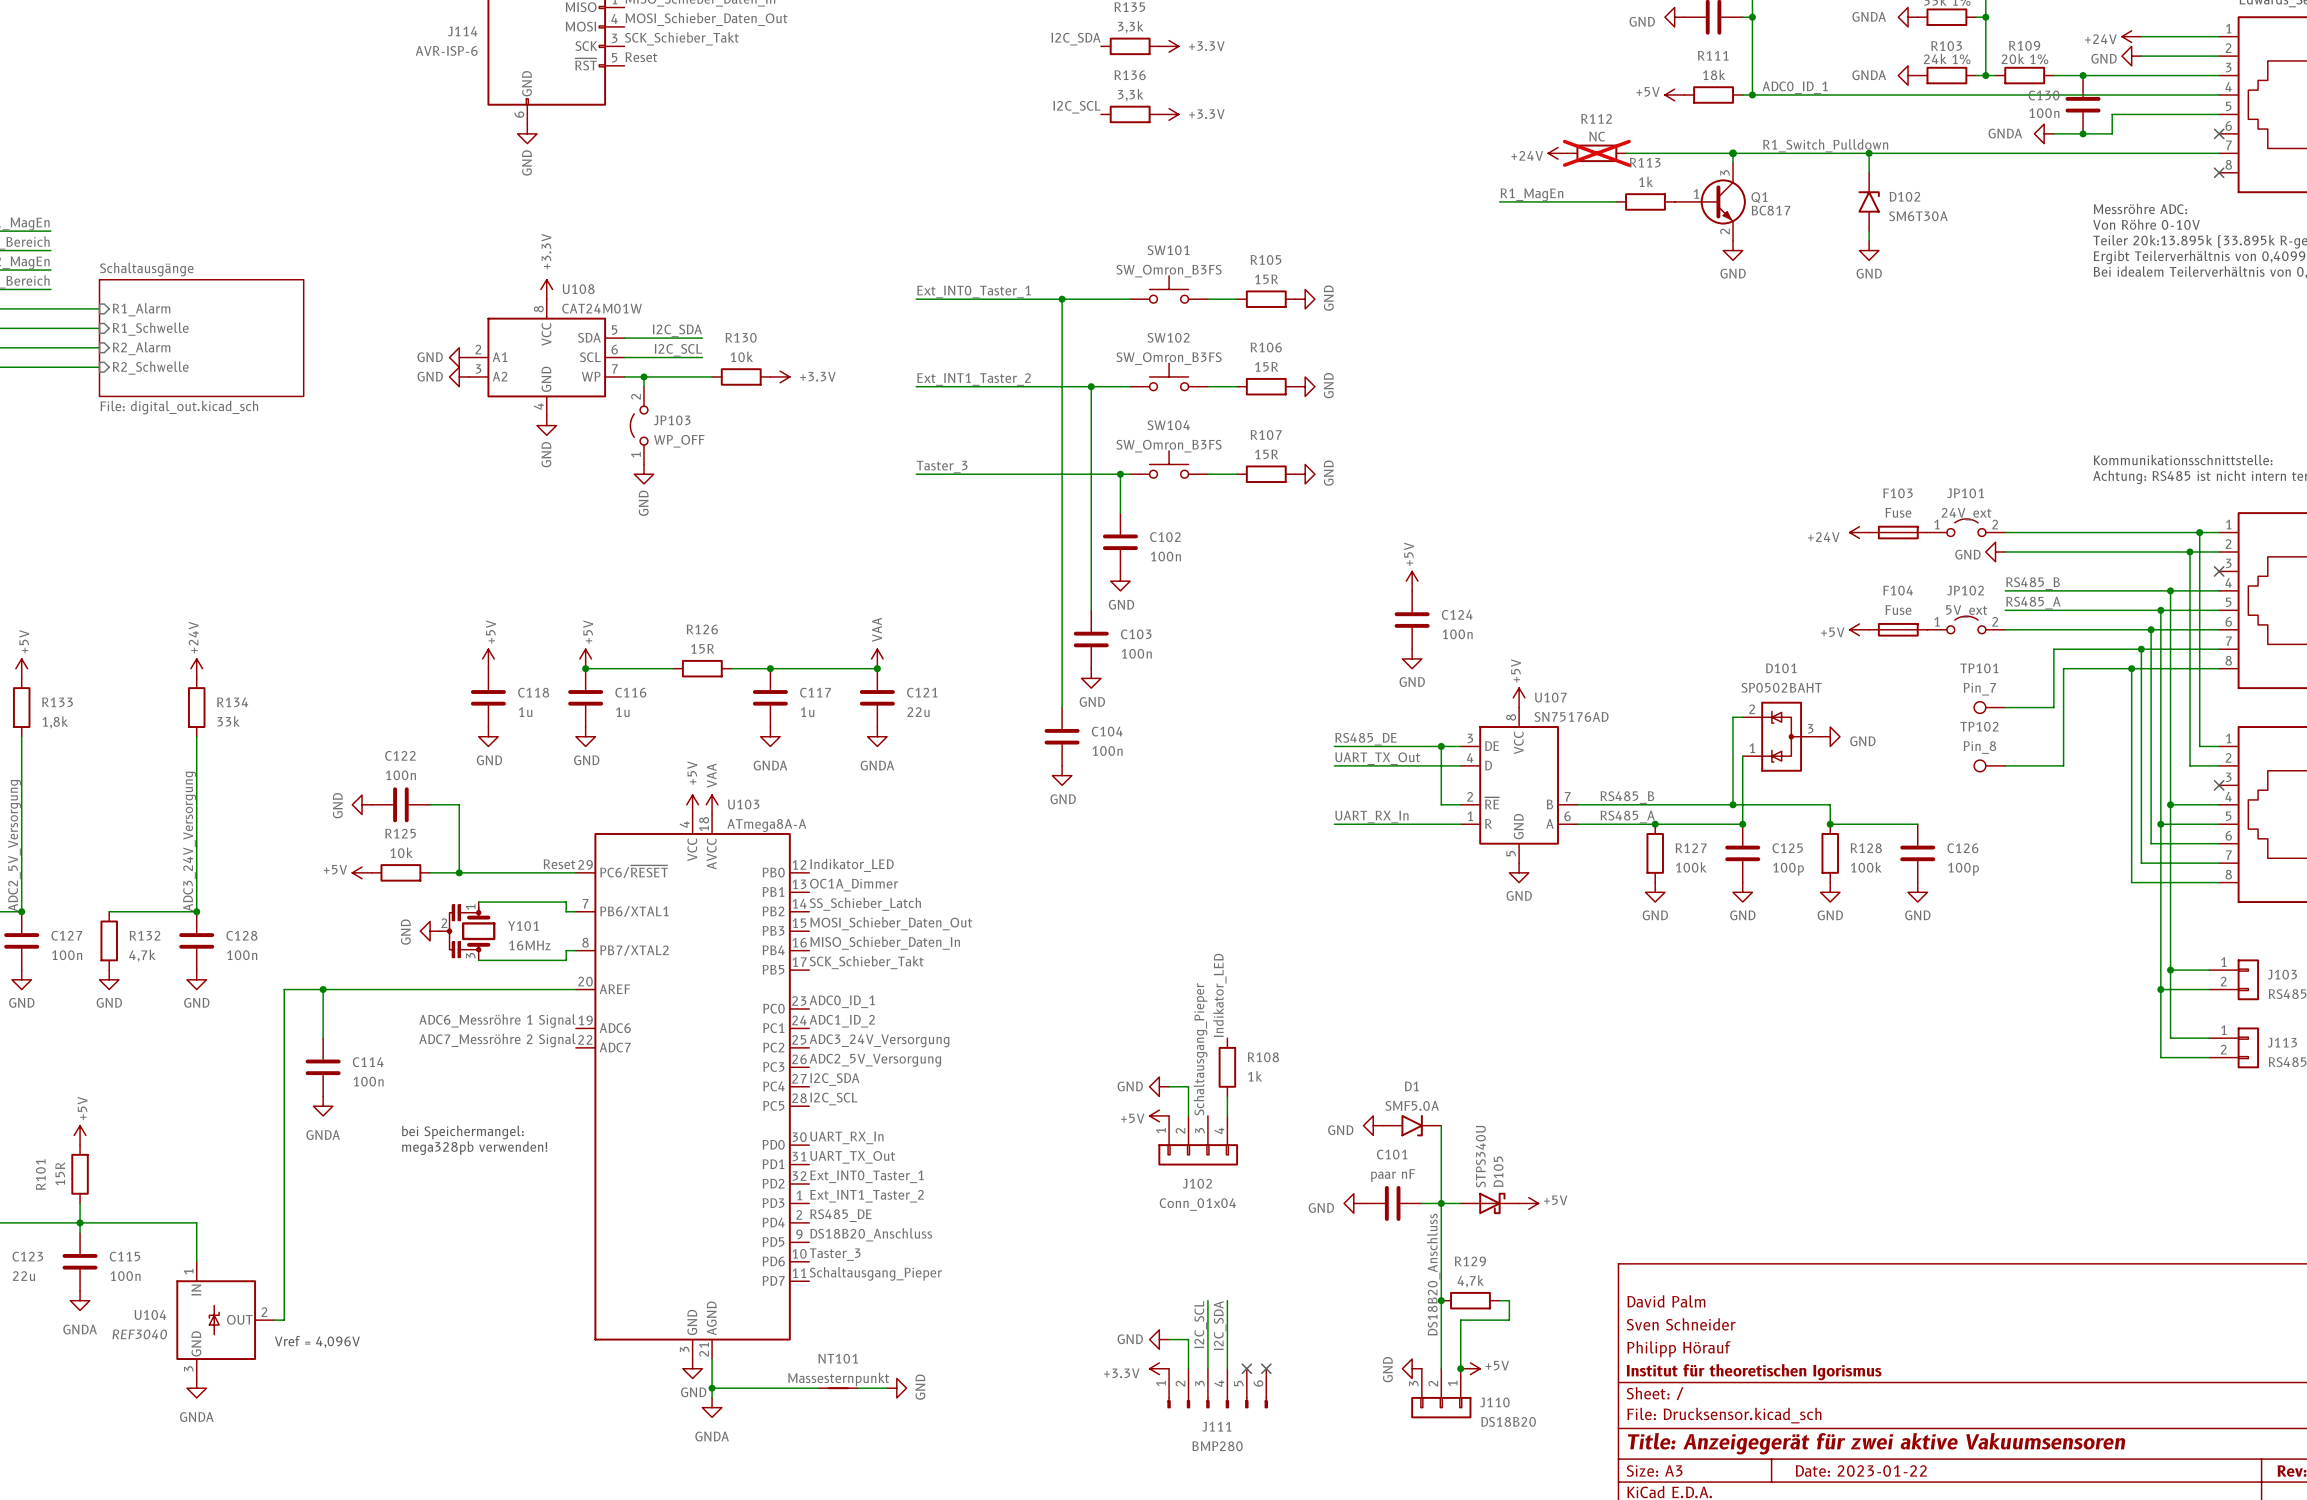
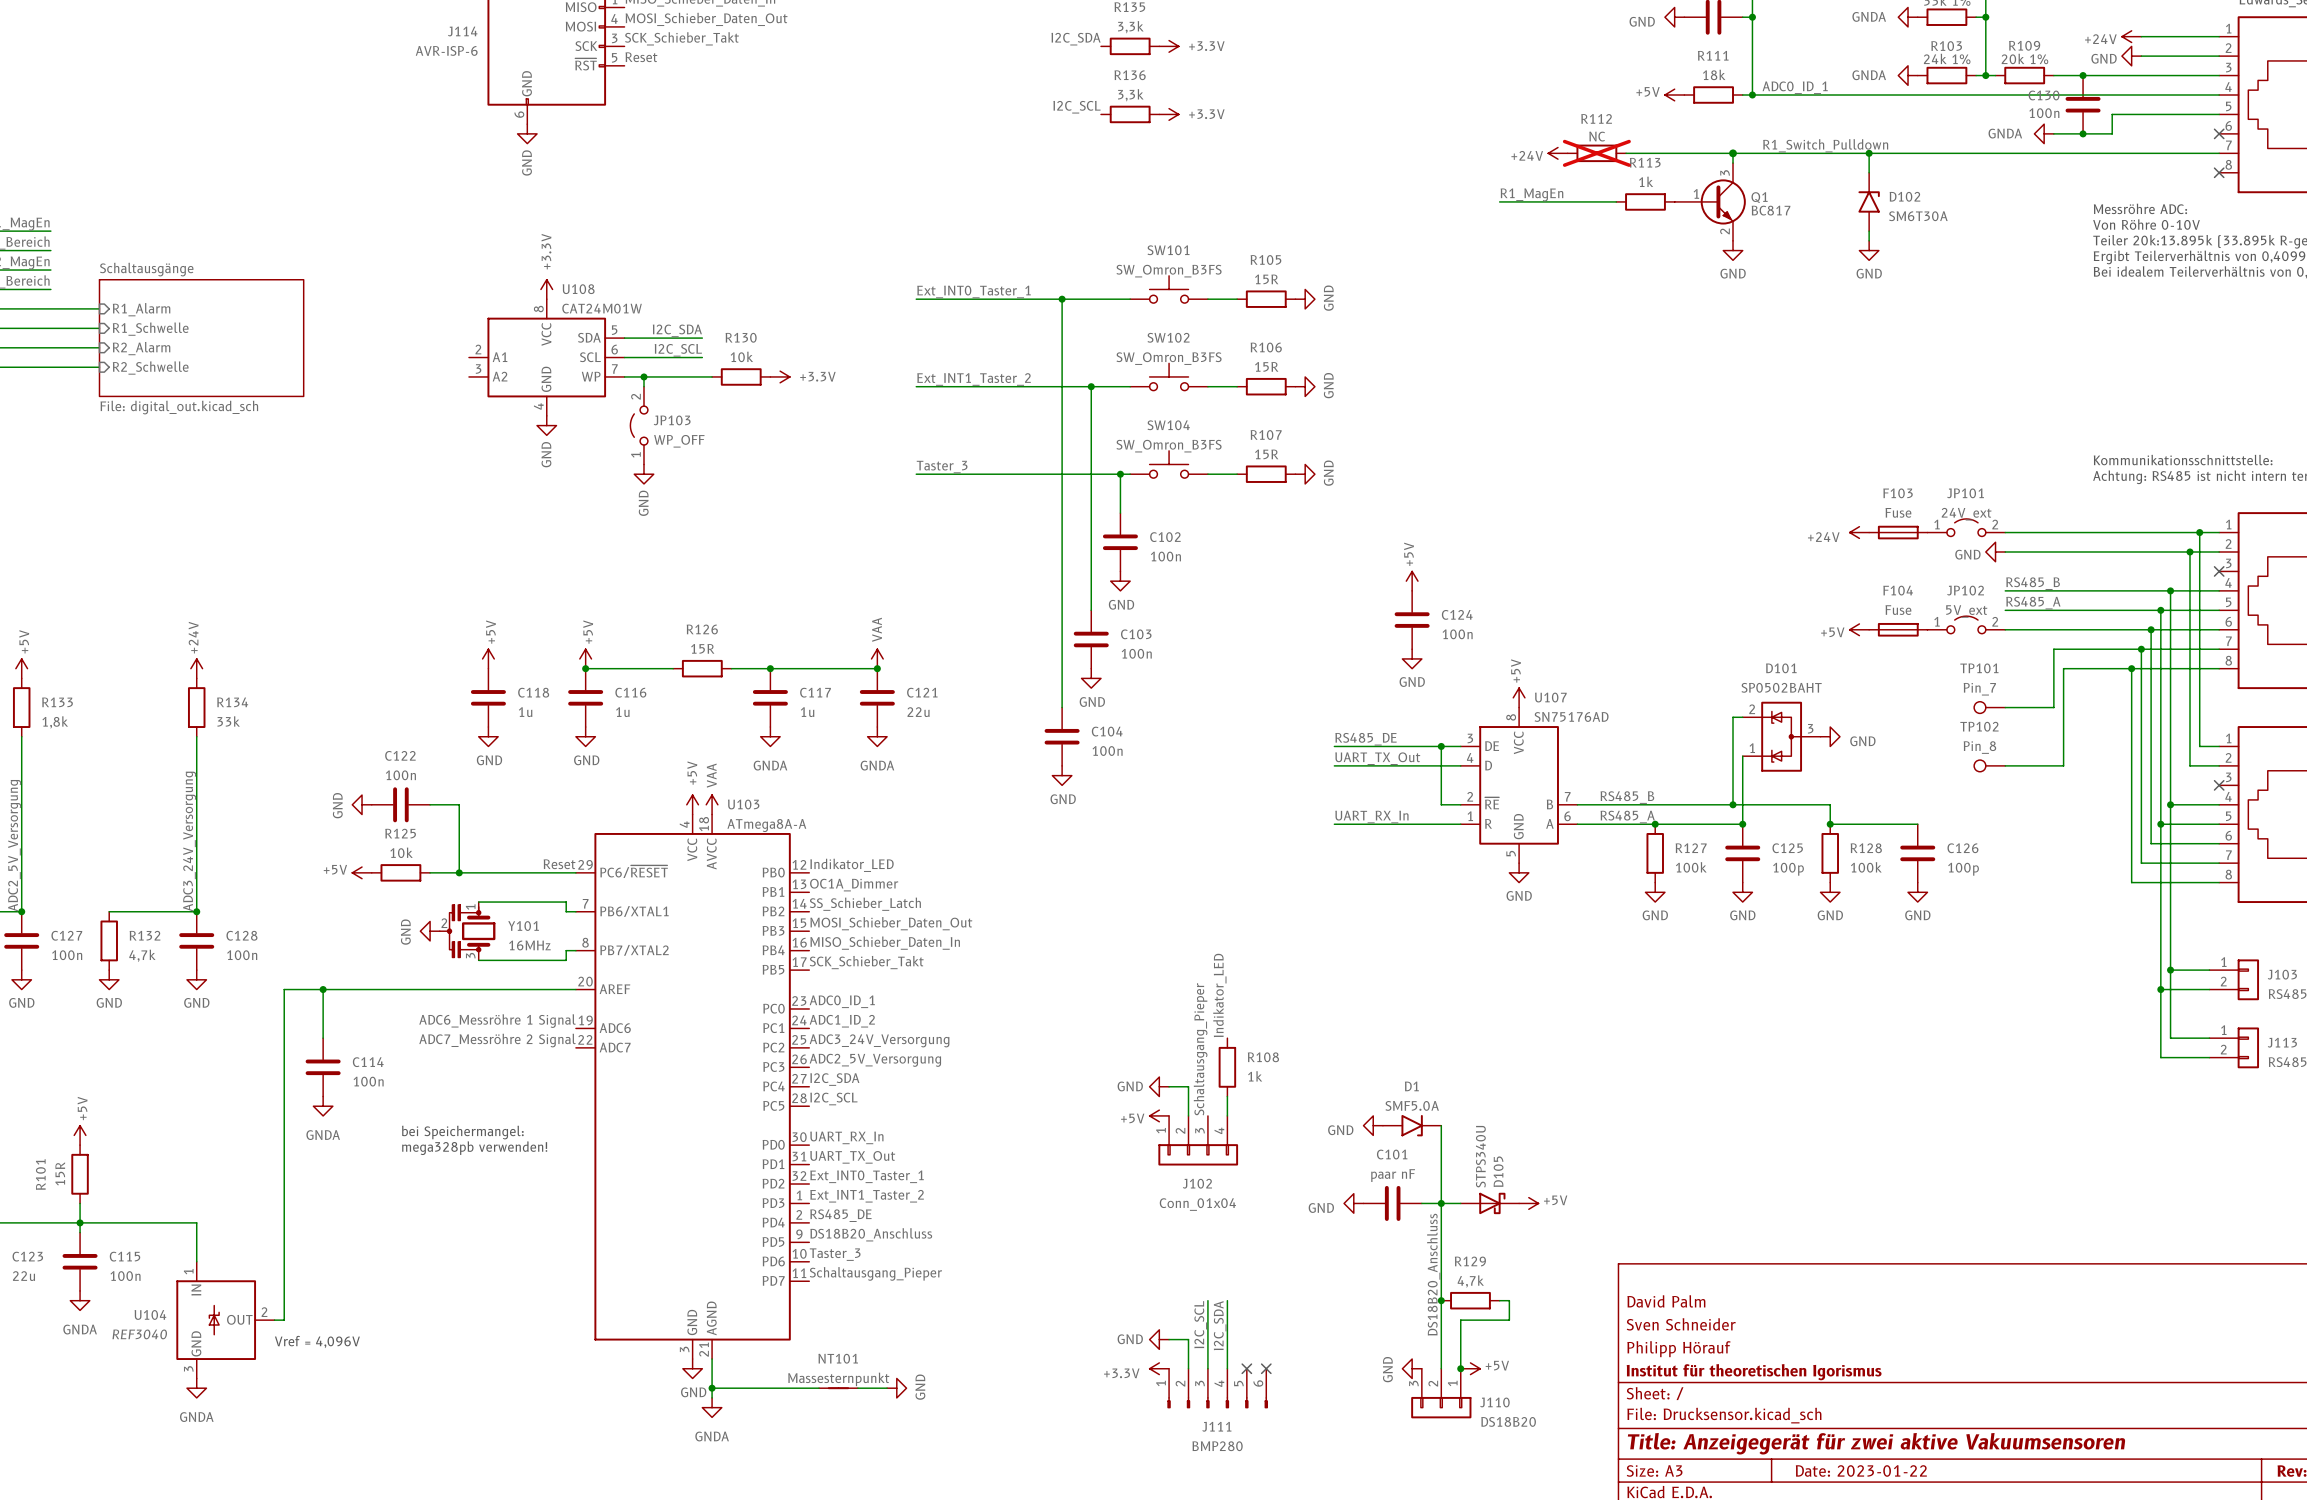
power symbol: GND (459, 357) -> none
power symbol: GND (459, 376) -> none

